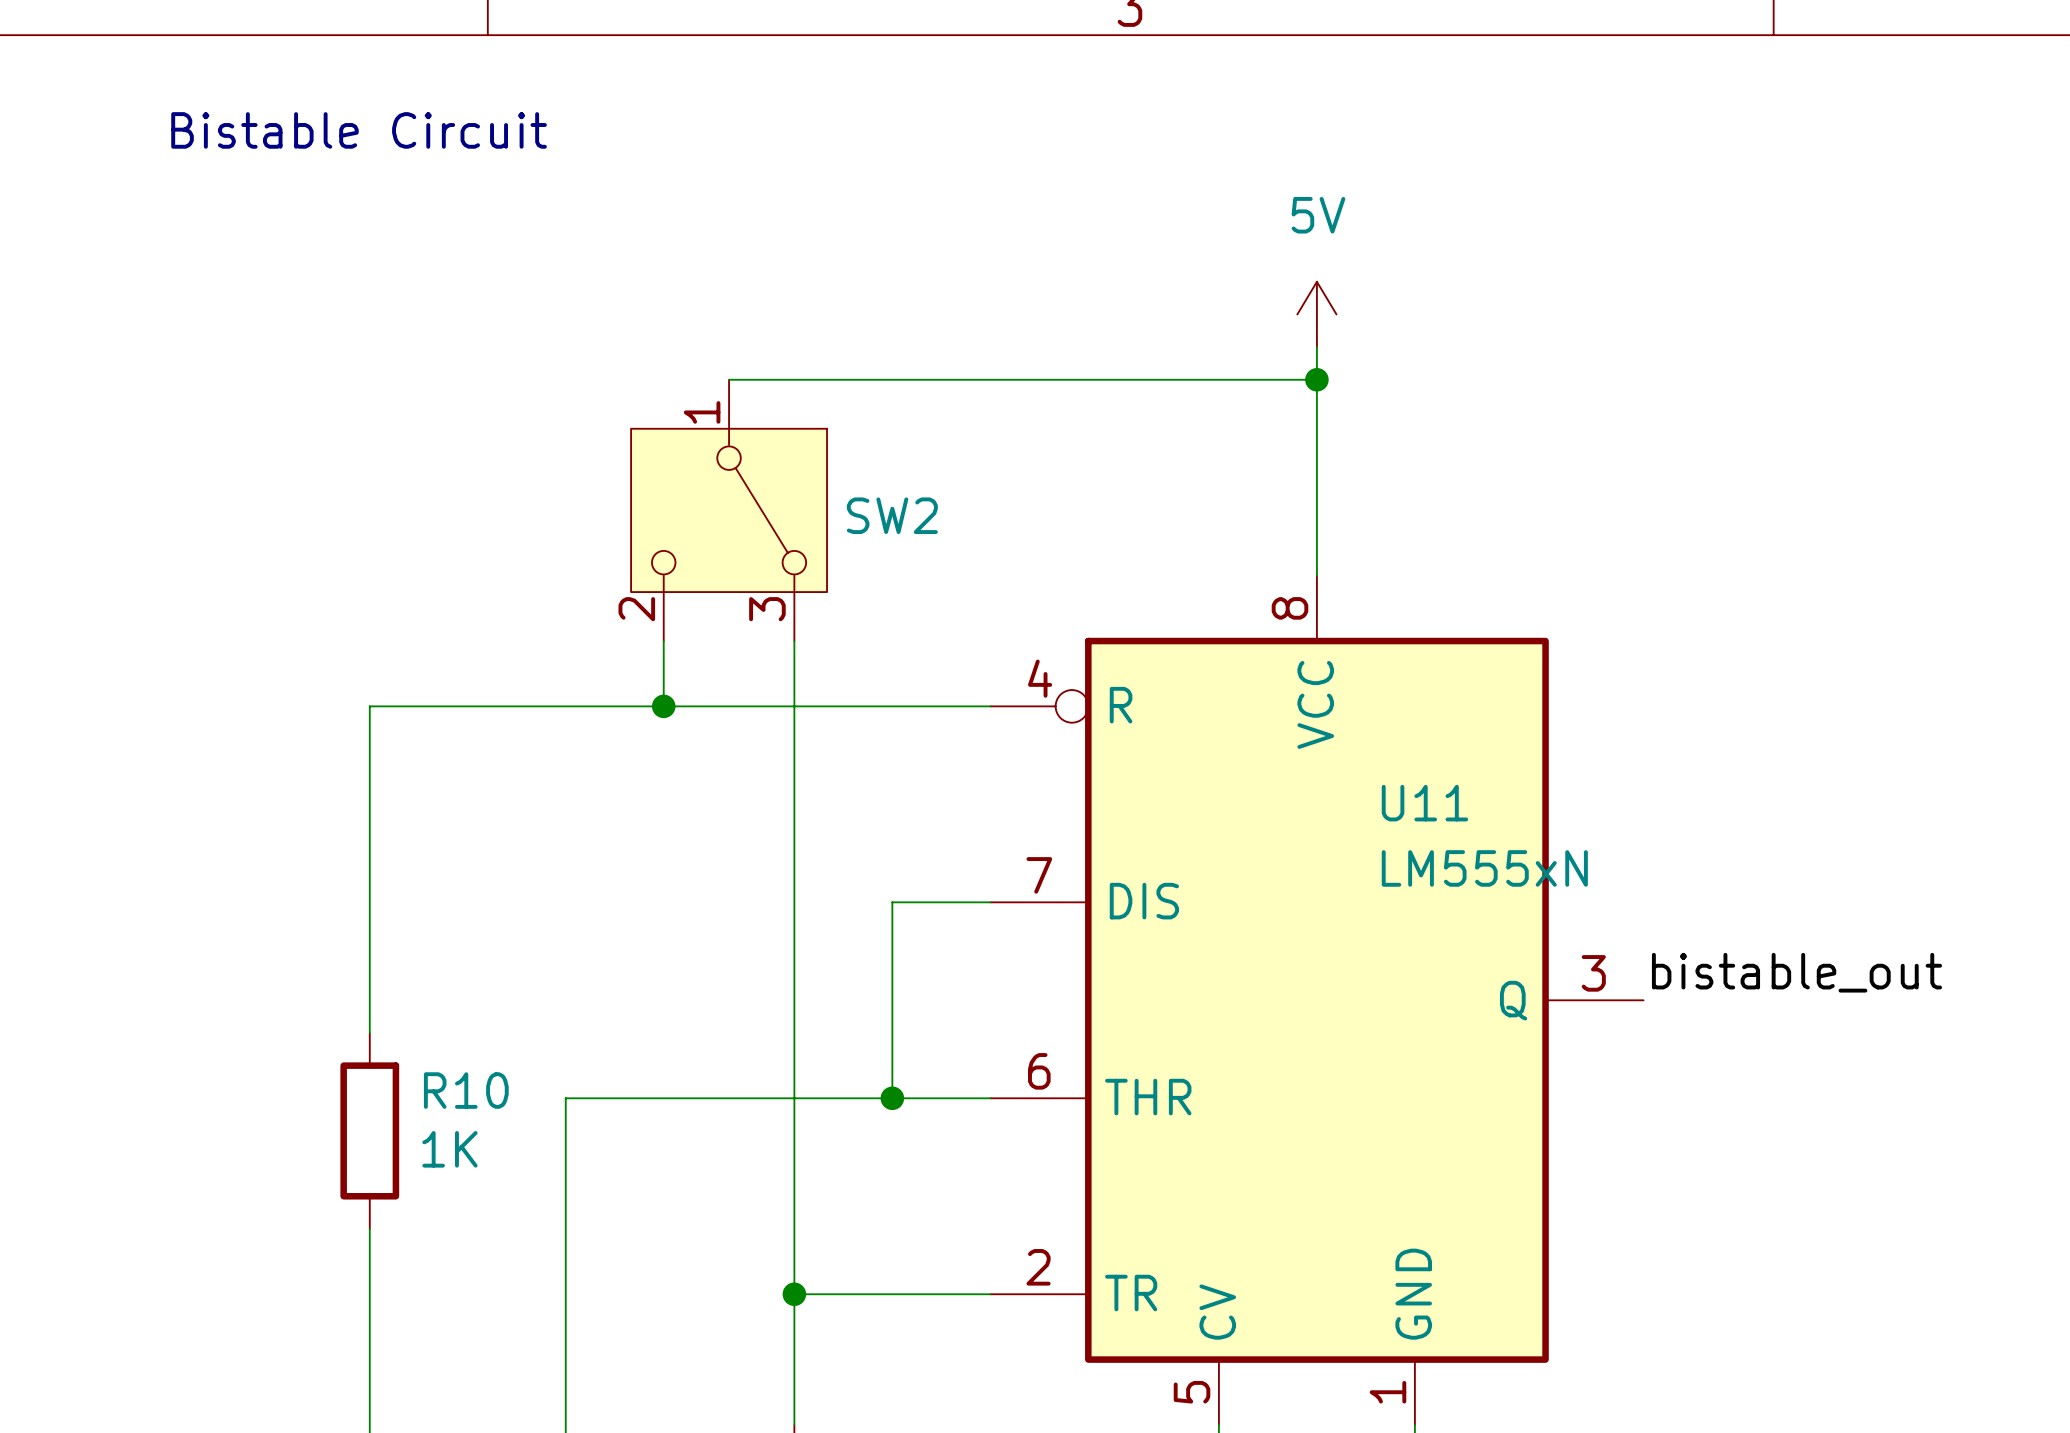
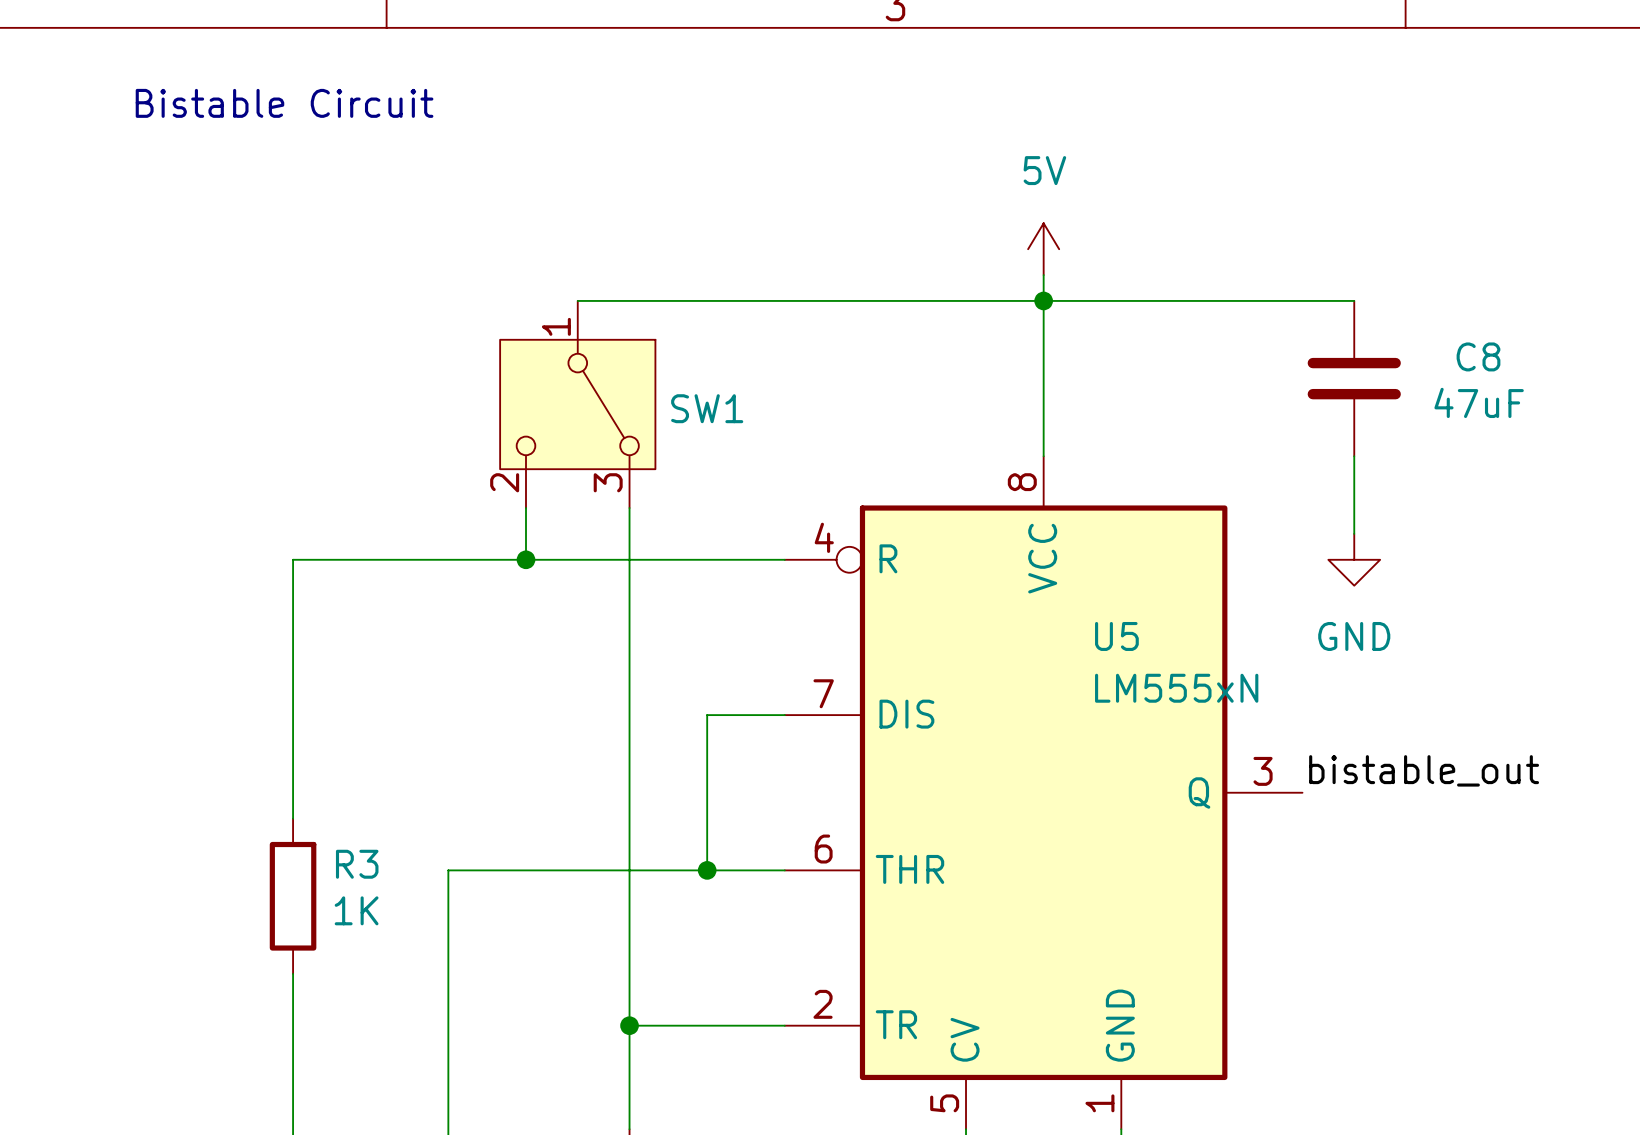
wire: none -> (1043, 300) (1354, 300)
C8: none -> 47uF (1354, 378)
SW2 name: SW2 (892, 515) -> SW1 (707, 408)
wire: none -> (1354, 456) (1354, 533)
power symbol: none -> GND (1354, 559)
U11 name: U11 (1424, 803) -> U5 (1116, 636)
R10 name: R10 (466, 1090) -> R3 (357, 864)

